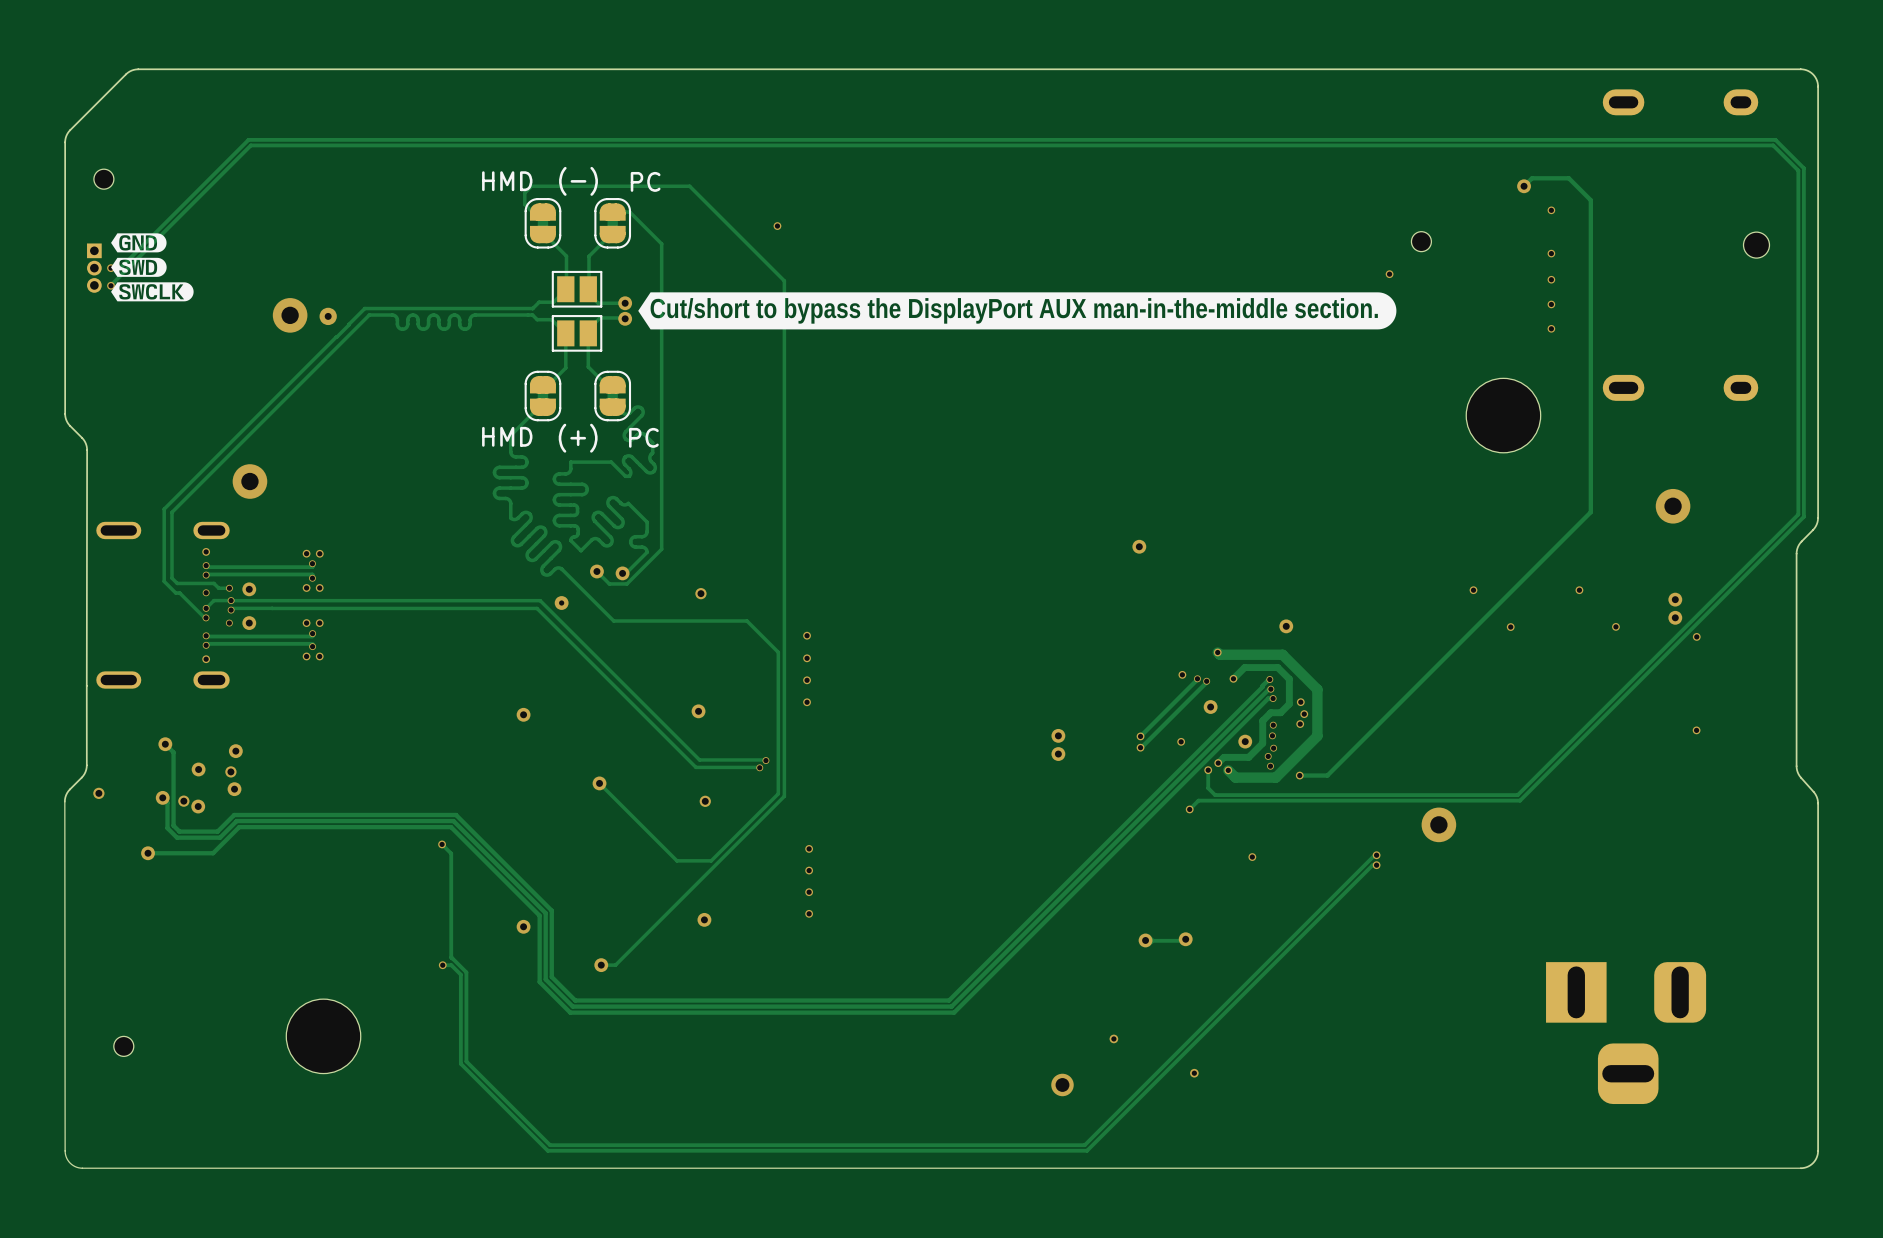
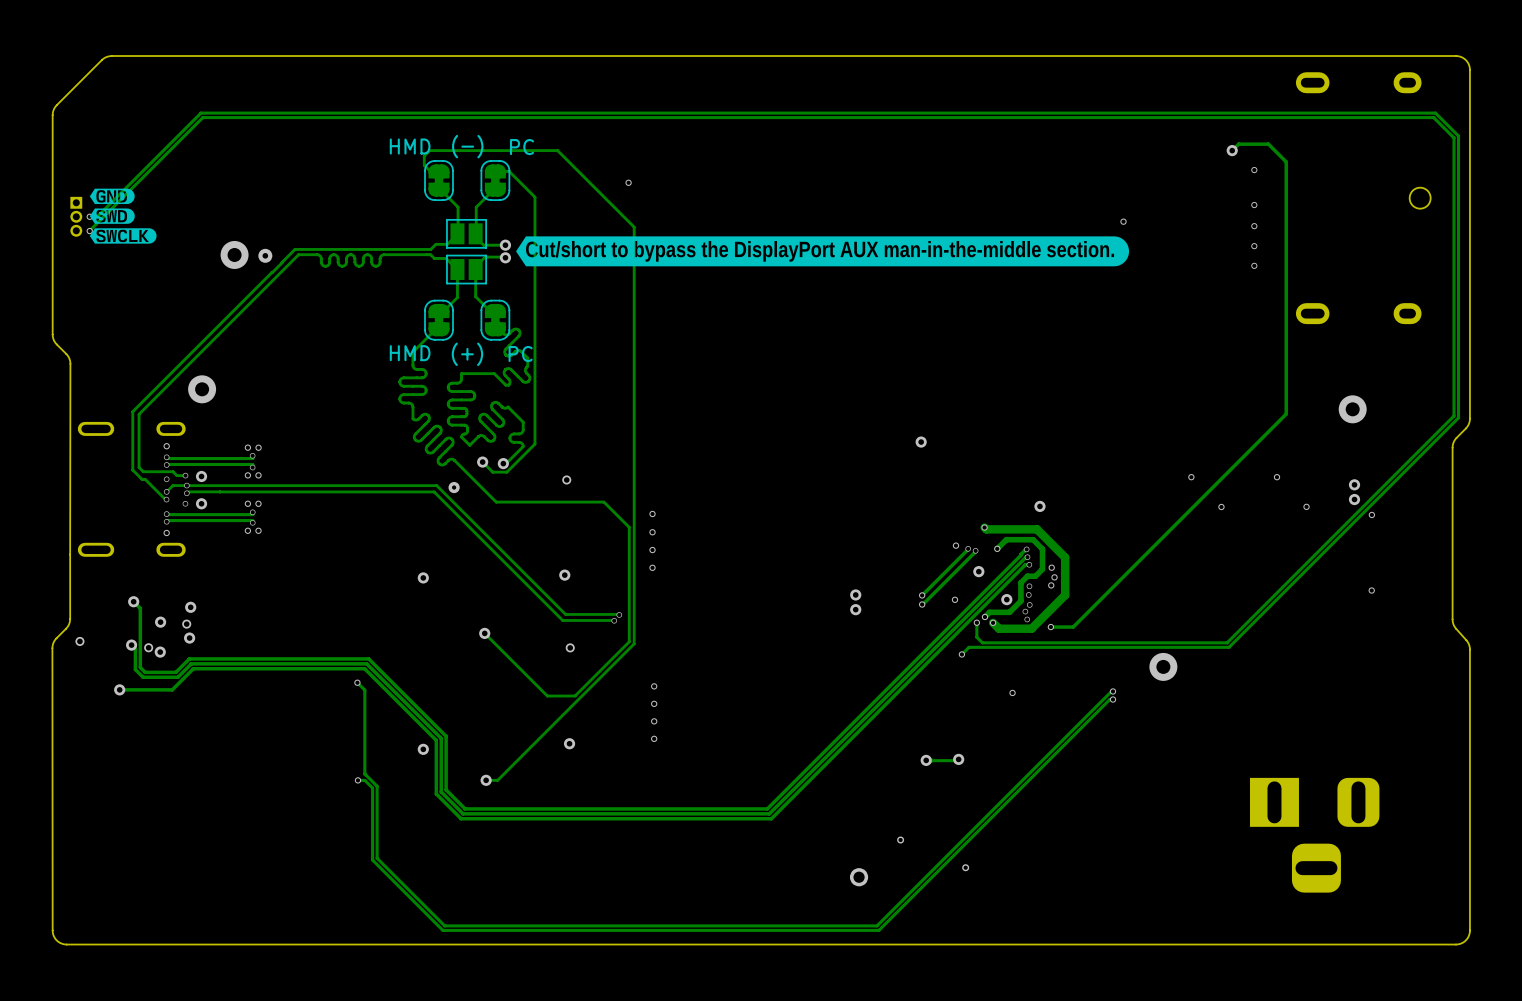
part: (103, 179) -> none
part: (1421, 241) -> none
part: (1503, 415) -> none
part: (323, 1036) -> none
part: (123, 1046) -> none

